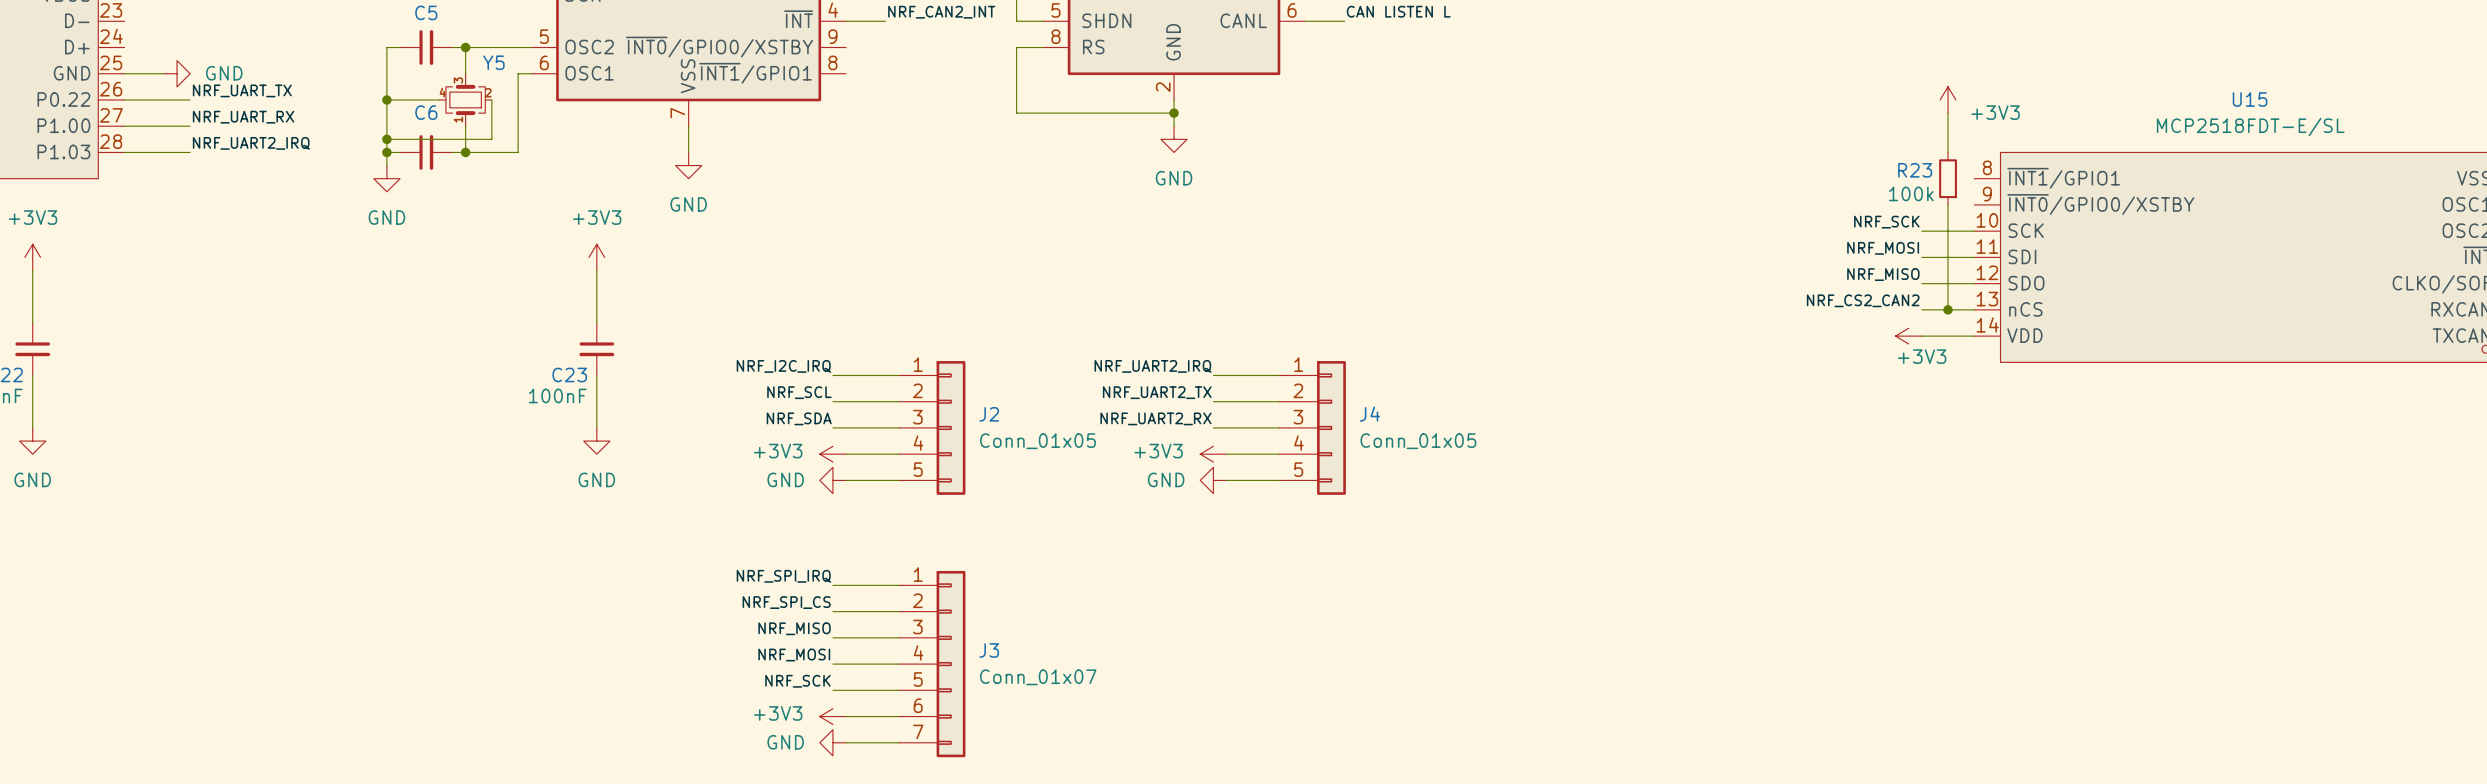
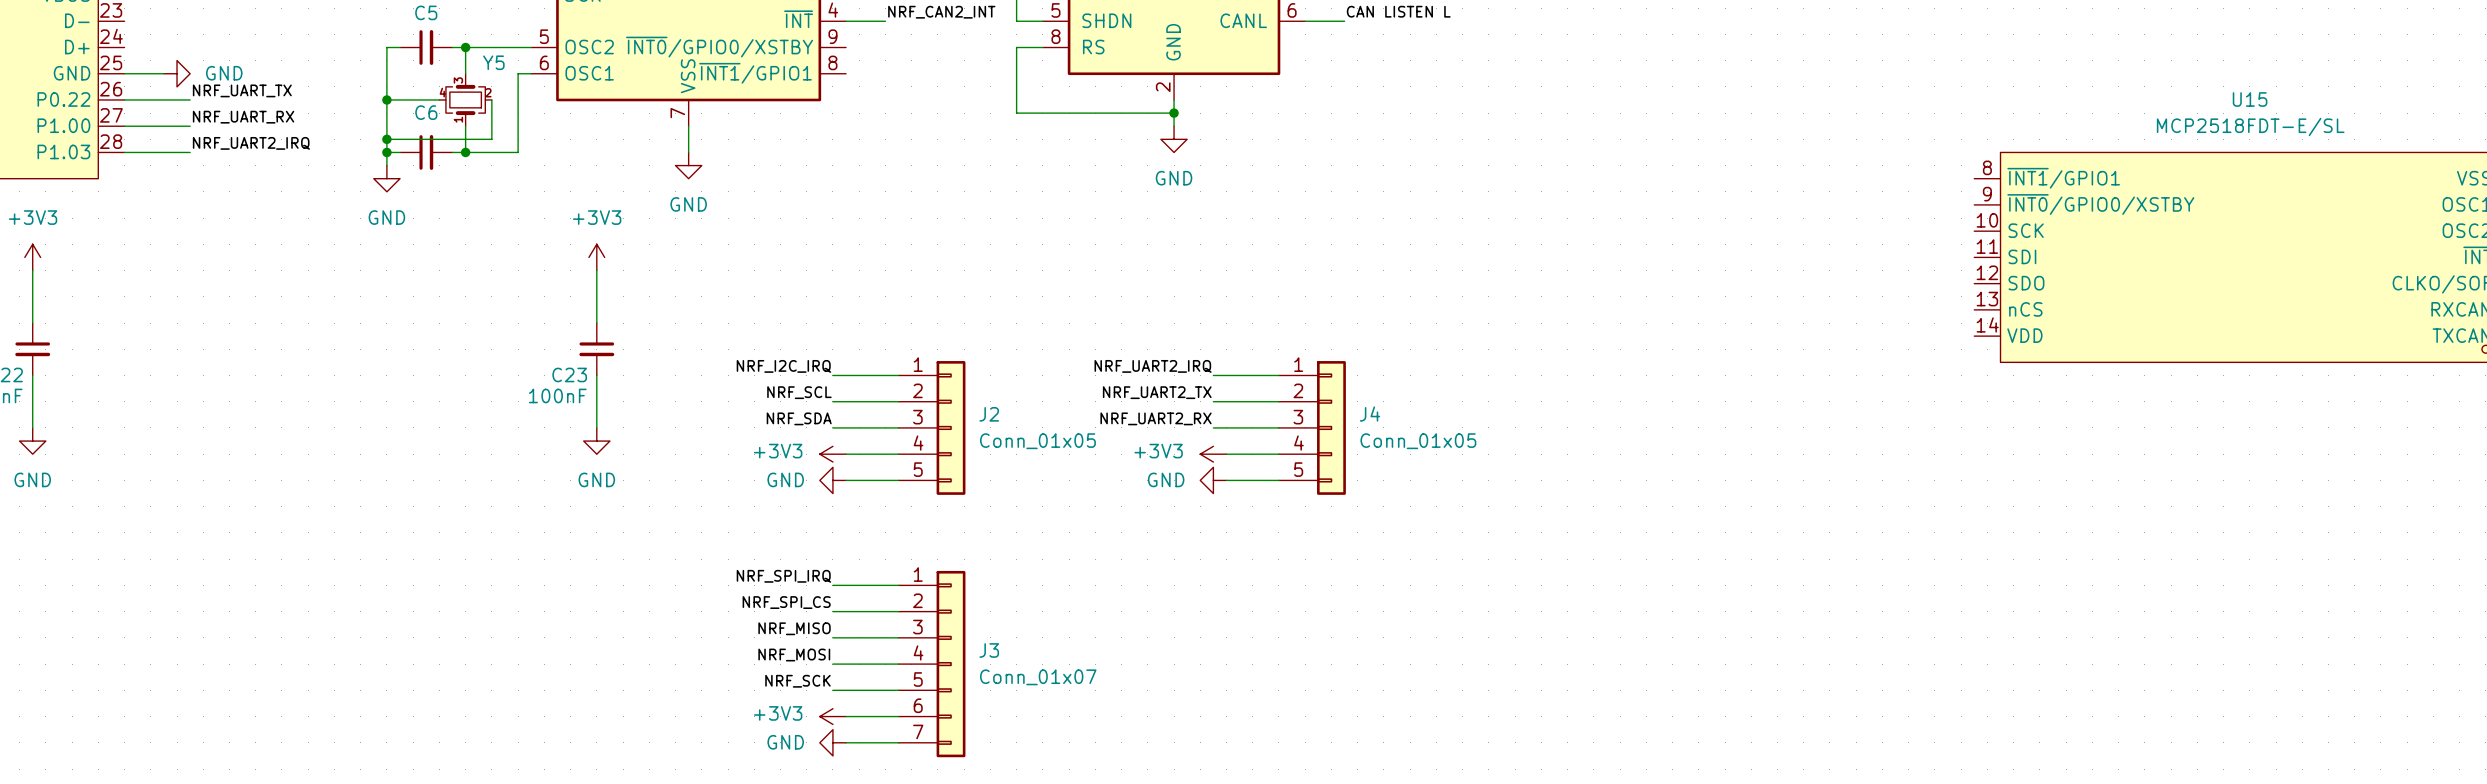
power symbol: +3V3 (1948, 99) -> none
wire: (1948, 113) (1948, 152) -> none
R23: (1948, 178) -> none
wire: (1948, 204) (1948, 309) -> none
label: NRF_SCK (1886, 222) -> none
wire: (1921, 231) (1974, 231) -> none
label: NRF_MOSI (1883, 248) -> none
wire: (1921, 257) (1974, 257) -> none
label: NRF_MISO (1883, 274) -> none
wire: (1921, 283) (1974, 283) -> none
label: NRF_CS2_CAN2 (1863, 300) -> none
wire: (1921, 309) (1974, 309) -> none
junction: (1948, 309) -> none
power symbol: +3V3 (1908, 336) -> none
wire: (1921, 336) (1974, 336) -> none

